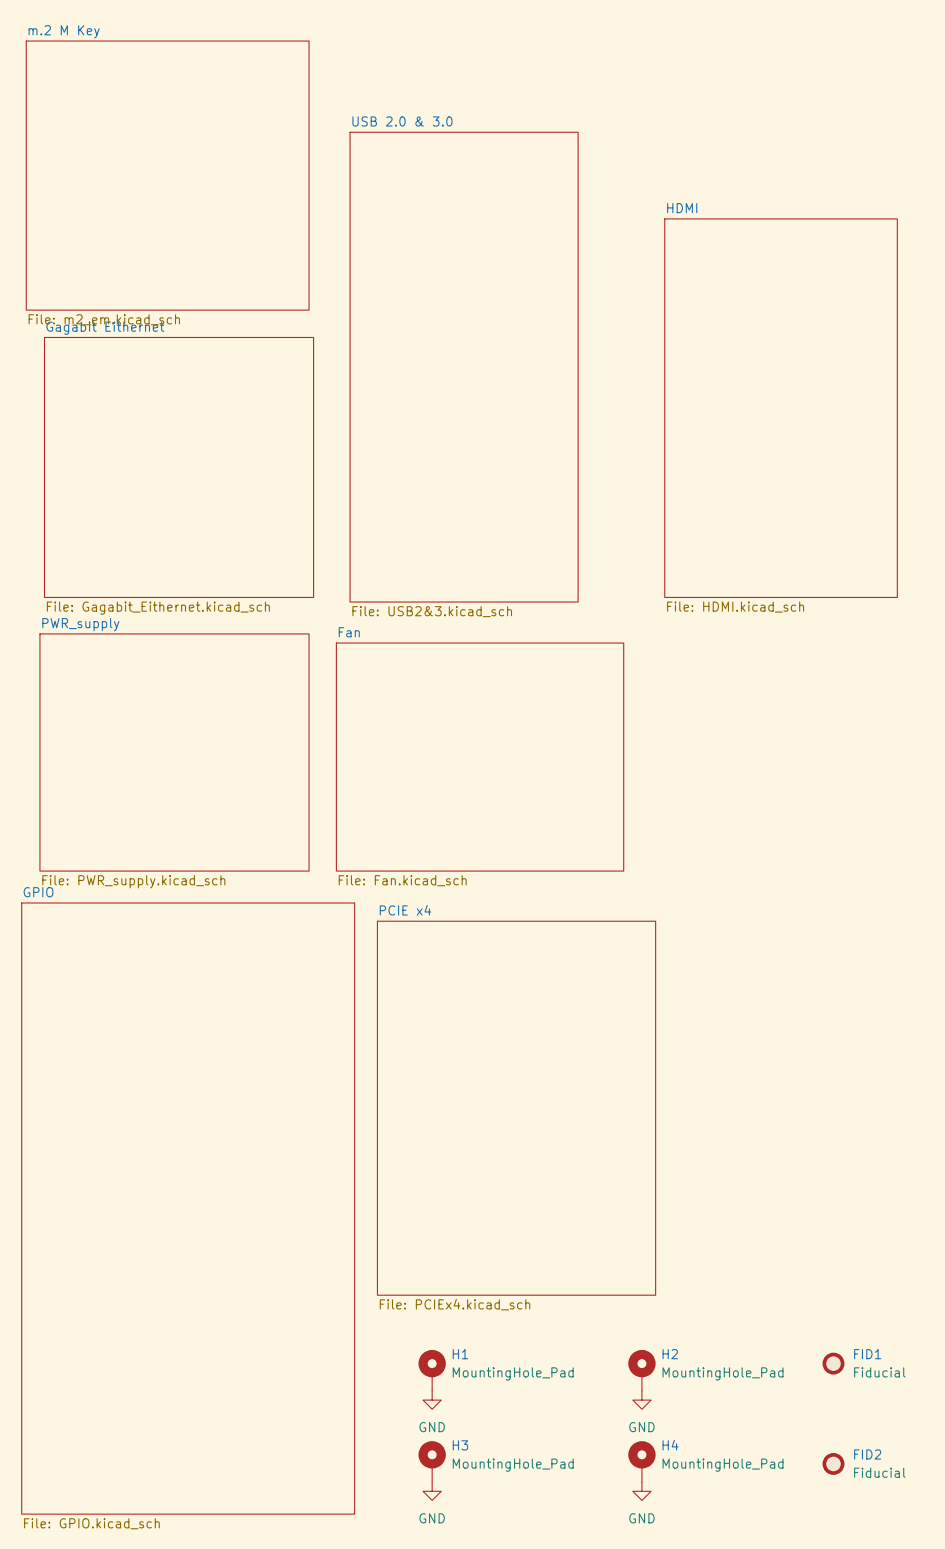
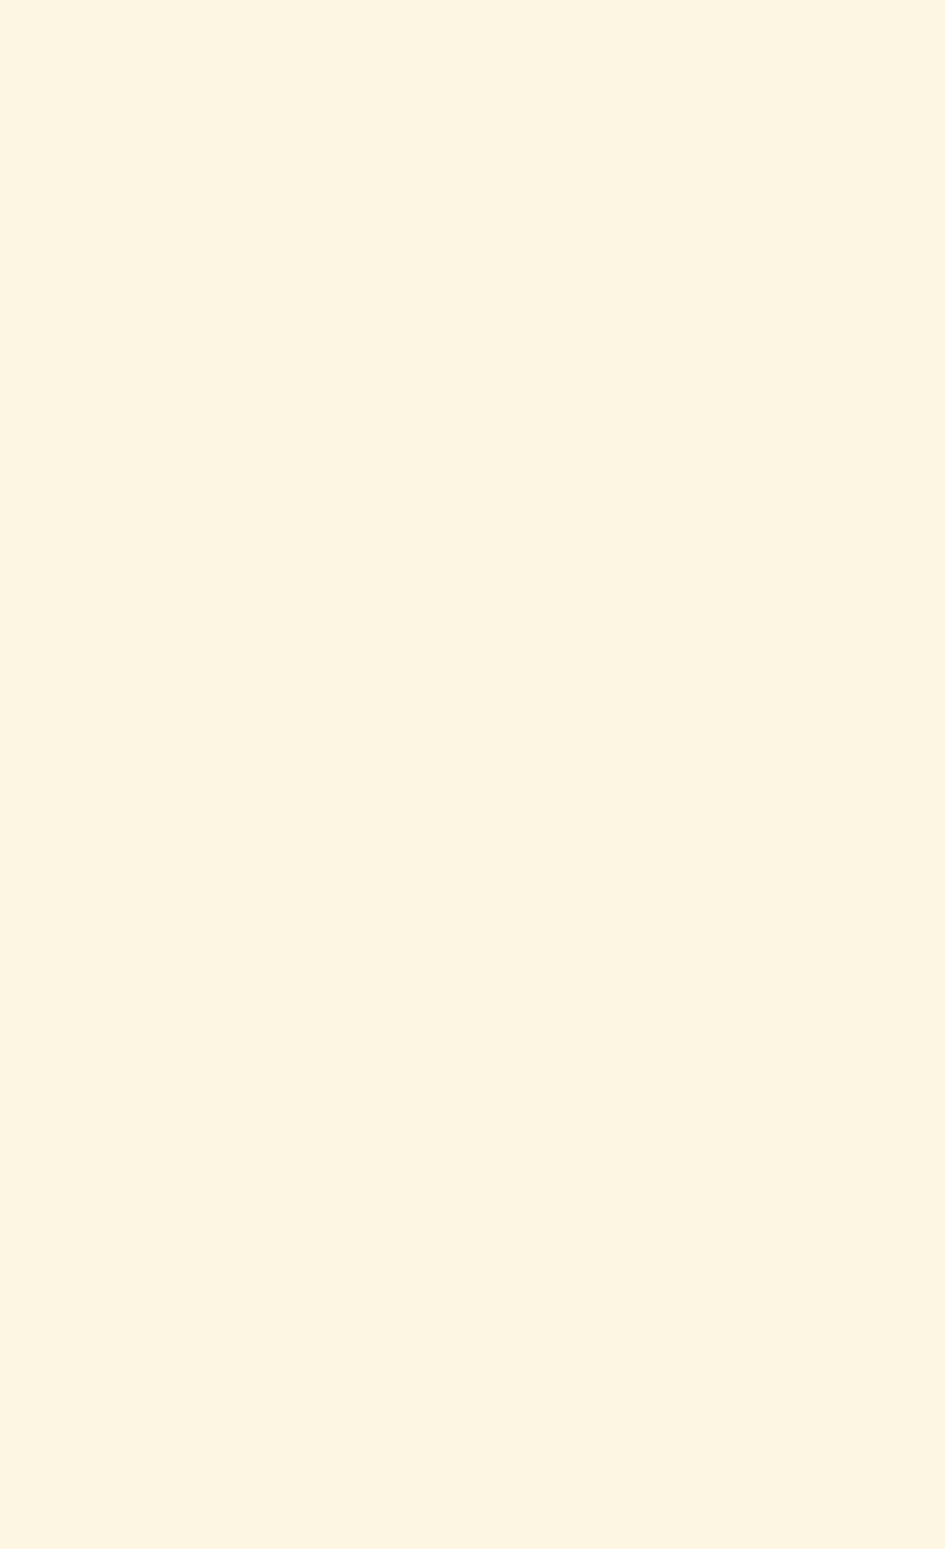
sheet m.2 M Key: File: m2_em.kicad_sch (167, 175) -> none
sheet USB 2.0 & 3.0: File: USB2&3.kicad_sch (464, 367) -> none
sheet HDMI: File: HDMI.kicad_sch (781, 408) -> none
sheet Gagabit Eithernet: File: Gagabit_Eithernet.kicad_sch (179, 467) -> none
sheet PWR_supply: File: PWR_supply.kicad_sch (174, 752) -> none
sheet Fan: File: Fan.kicad_sch (480, 757) -> none
sheet PCIE x4: File: PCIEx4.kicad_sch (516, 1108) -> none
sheet GPIO: File: GPIO.kicad_sch (188, 1208) -> none
FID1: Fiducial (833, 1363) -> none
H1: MountingHole_Pad (432, 1370) -> none
H2: MountingHole_Pad (641, 1370) -> none
power symbol: GND (432, 1400) -> none
power symbol: GND (641, 1400) -> none
H3: MountingHole_Pad (432, 1461) -> none
H4: MountingHole_Pad (641, 1461) -> none
FID2: Fiducial (833, 1463) -> none
power symbol: GND (432, 1491) -> none
power symbol: GND (641, 1491) -> none

